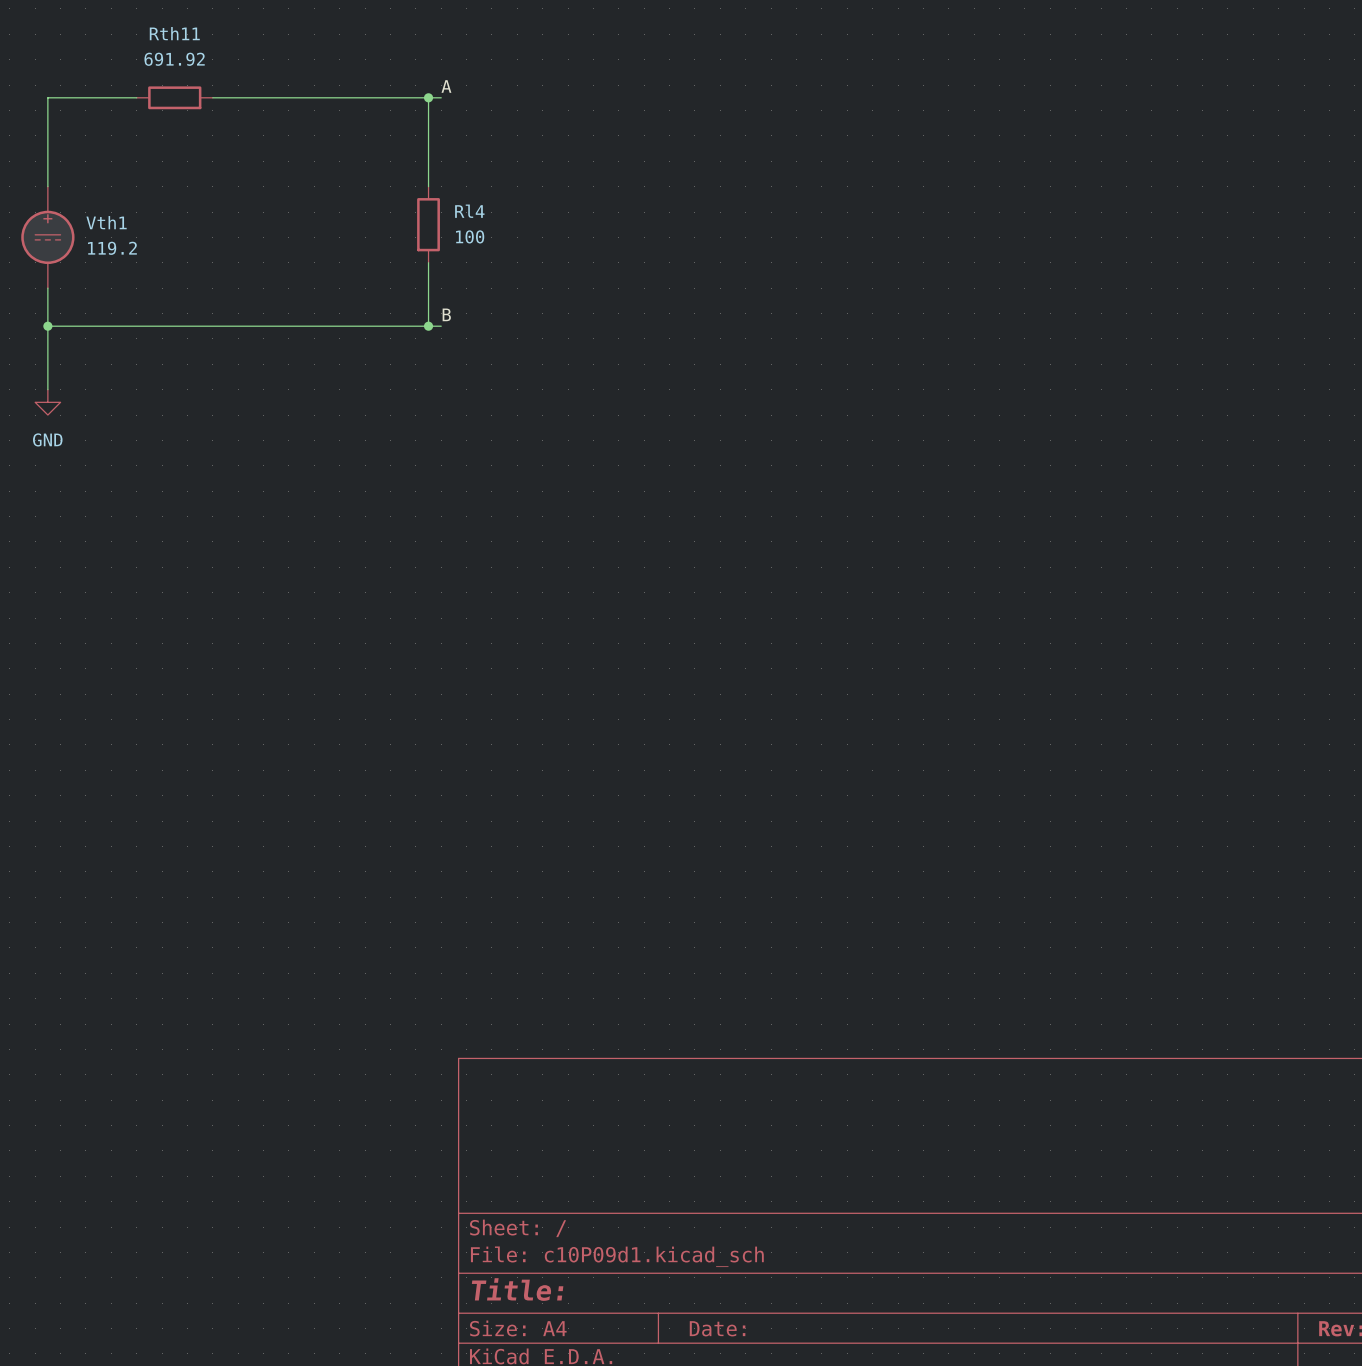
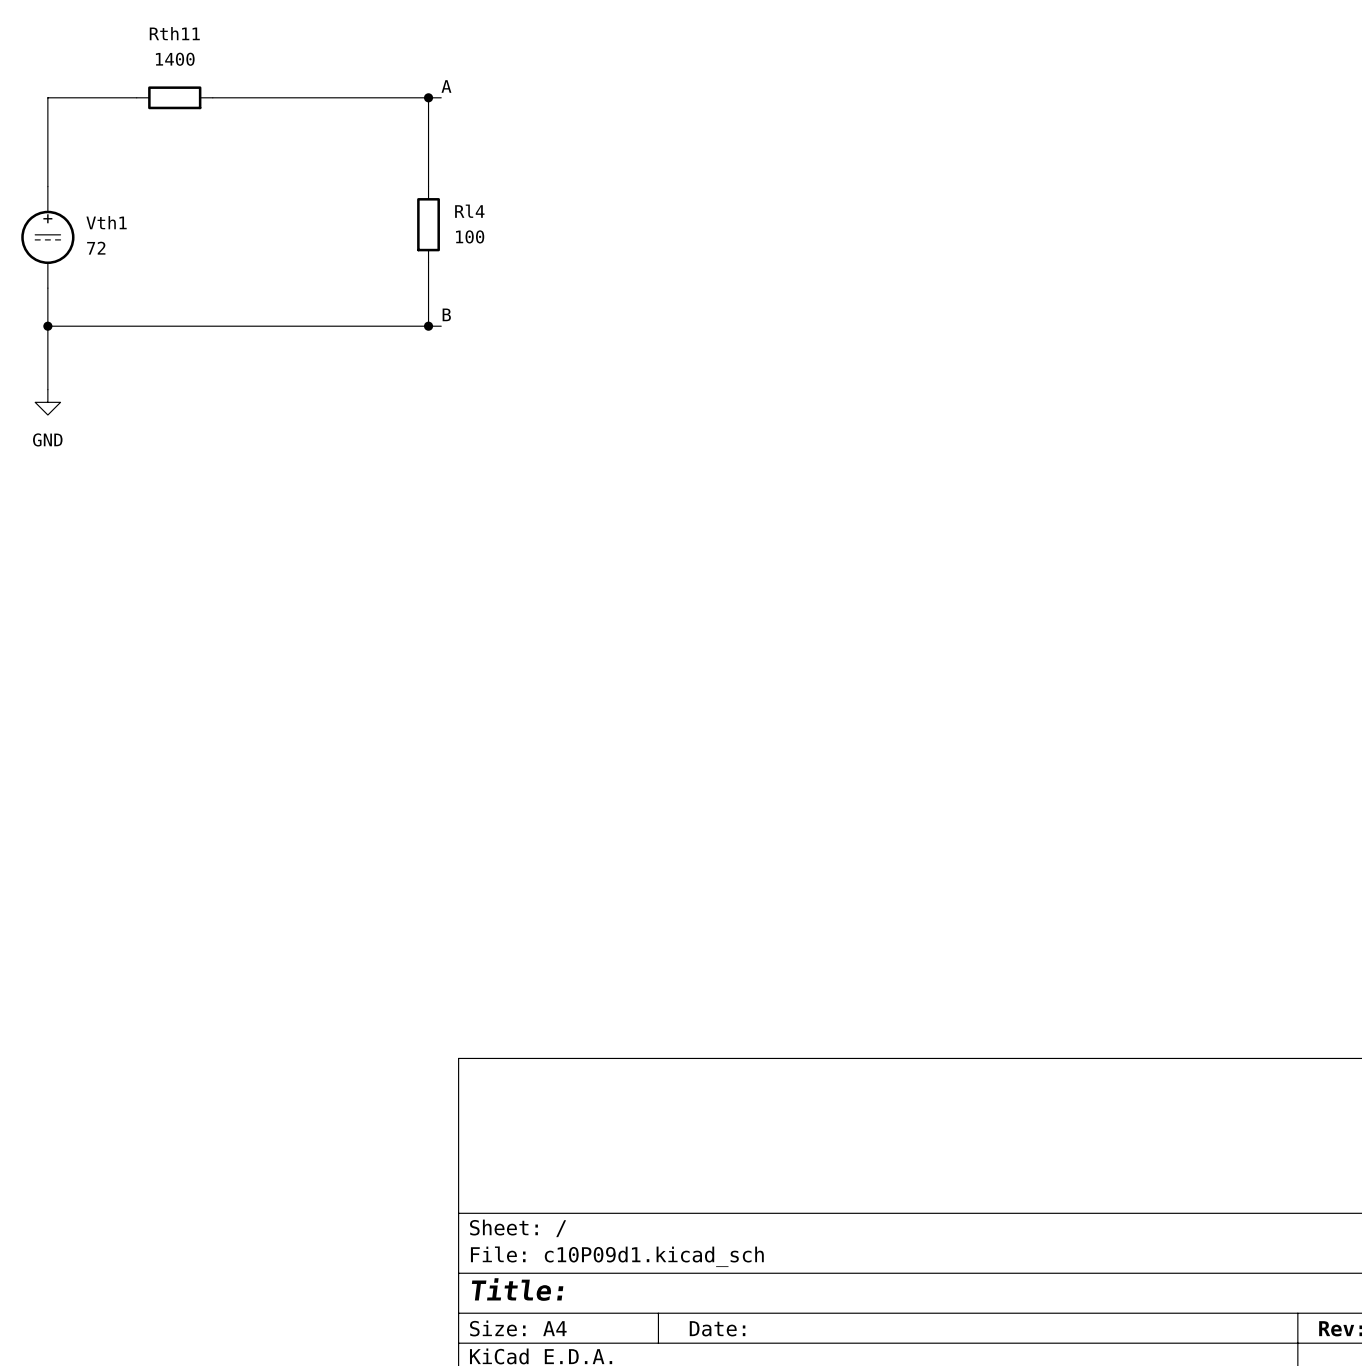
Rth11 value: 691.92 (174, 59) -> 1400 (175, 59)
Vth1 value: 119.2 (112, 248) -> 72 (96, 248)

